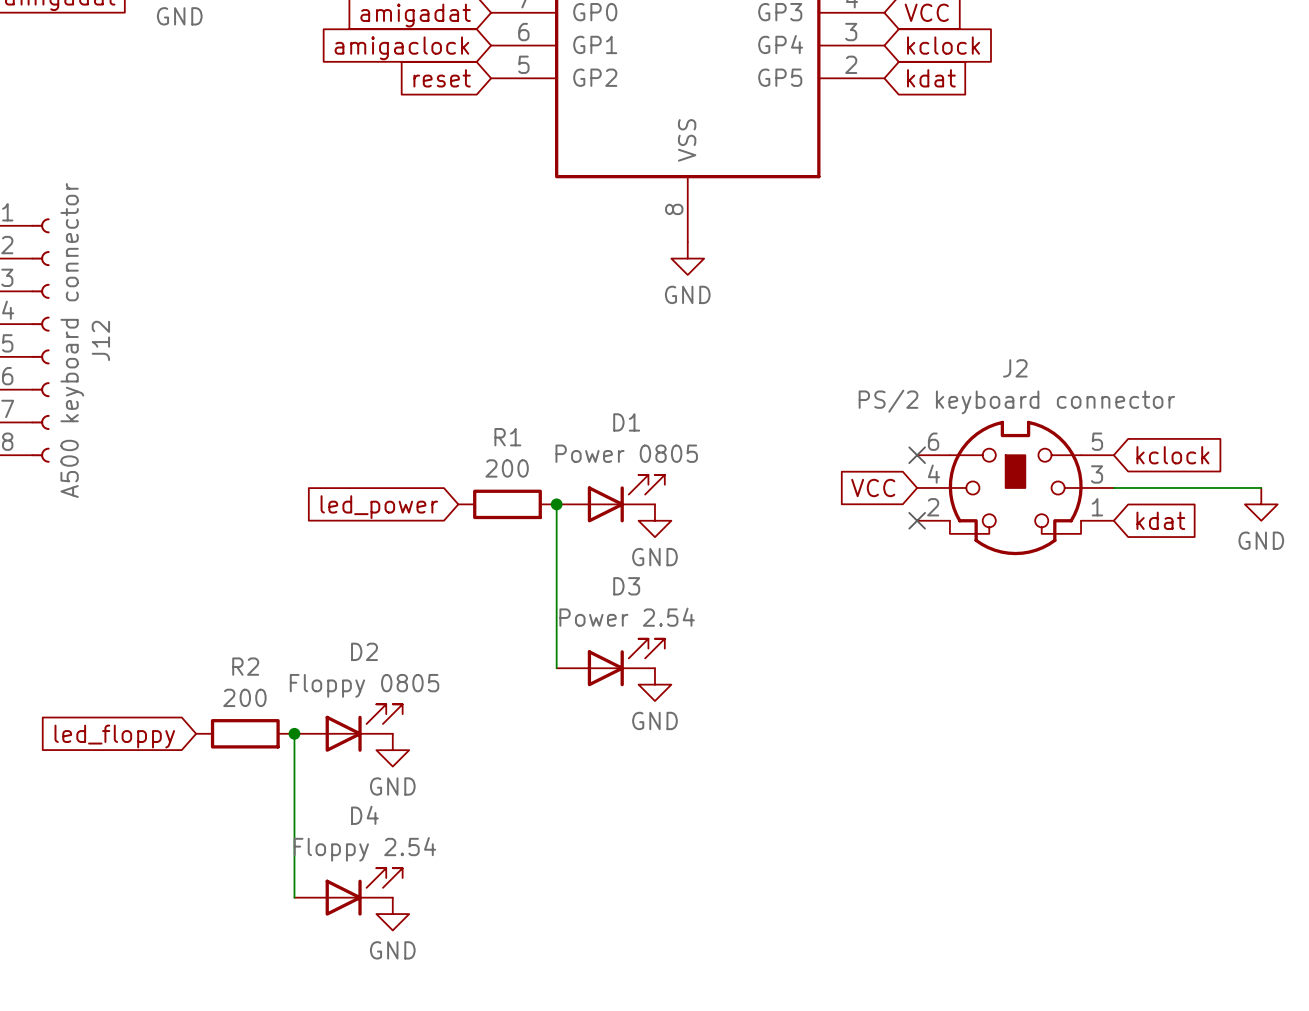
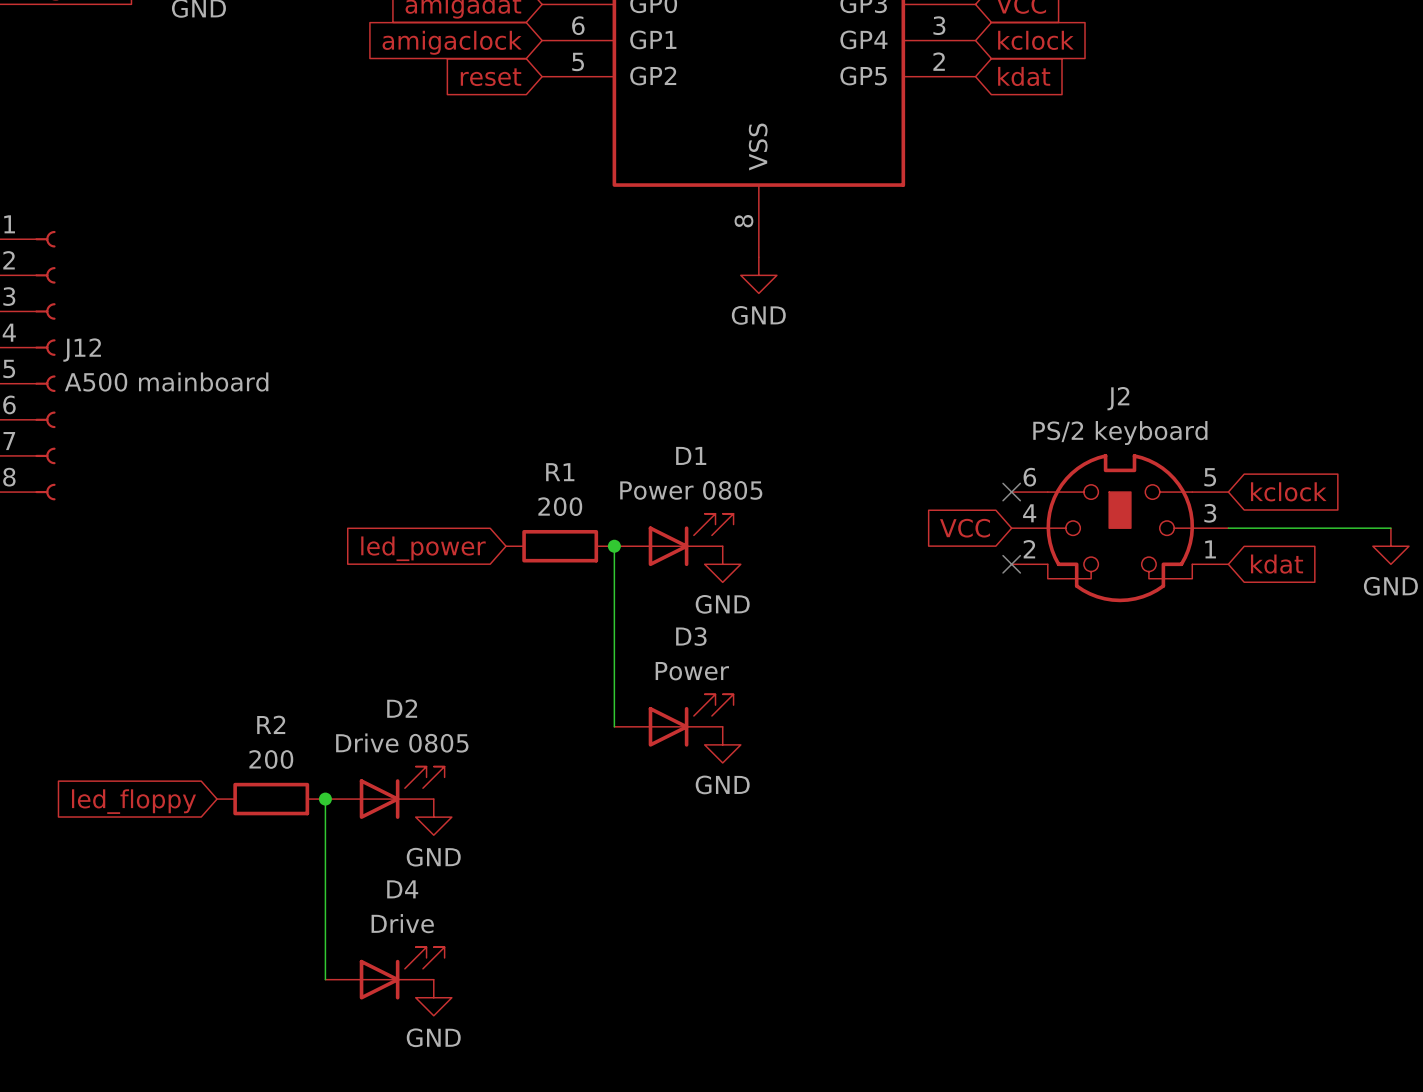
J12 value: A500 keyboard connector (72, 340) -> A500 mainboard (166, 382)
J12 name rotation: 0° (100, 340) -> 90° clockwise (82, 350)
J2 value: PS/2 keyboard connector (1016, 401) -> PS/2 keyboard (1120, 433)
D3 value: Power 2.54 (627, 617) -> Power (692, 671)
D2 value: Floppy 0805 (364, 685) -> Drive 0805 (402, 743)
D4 value: Floppy 2.54 (364, 849) -> Drive (402, 923)

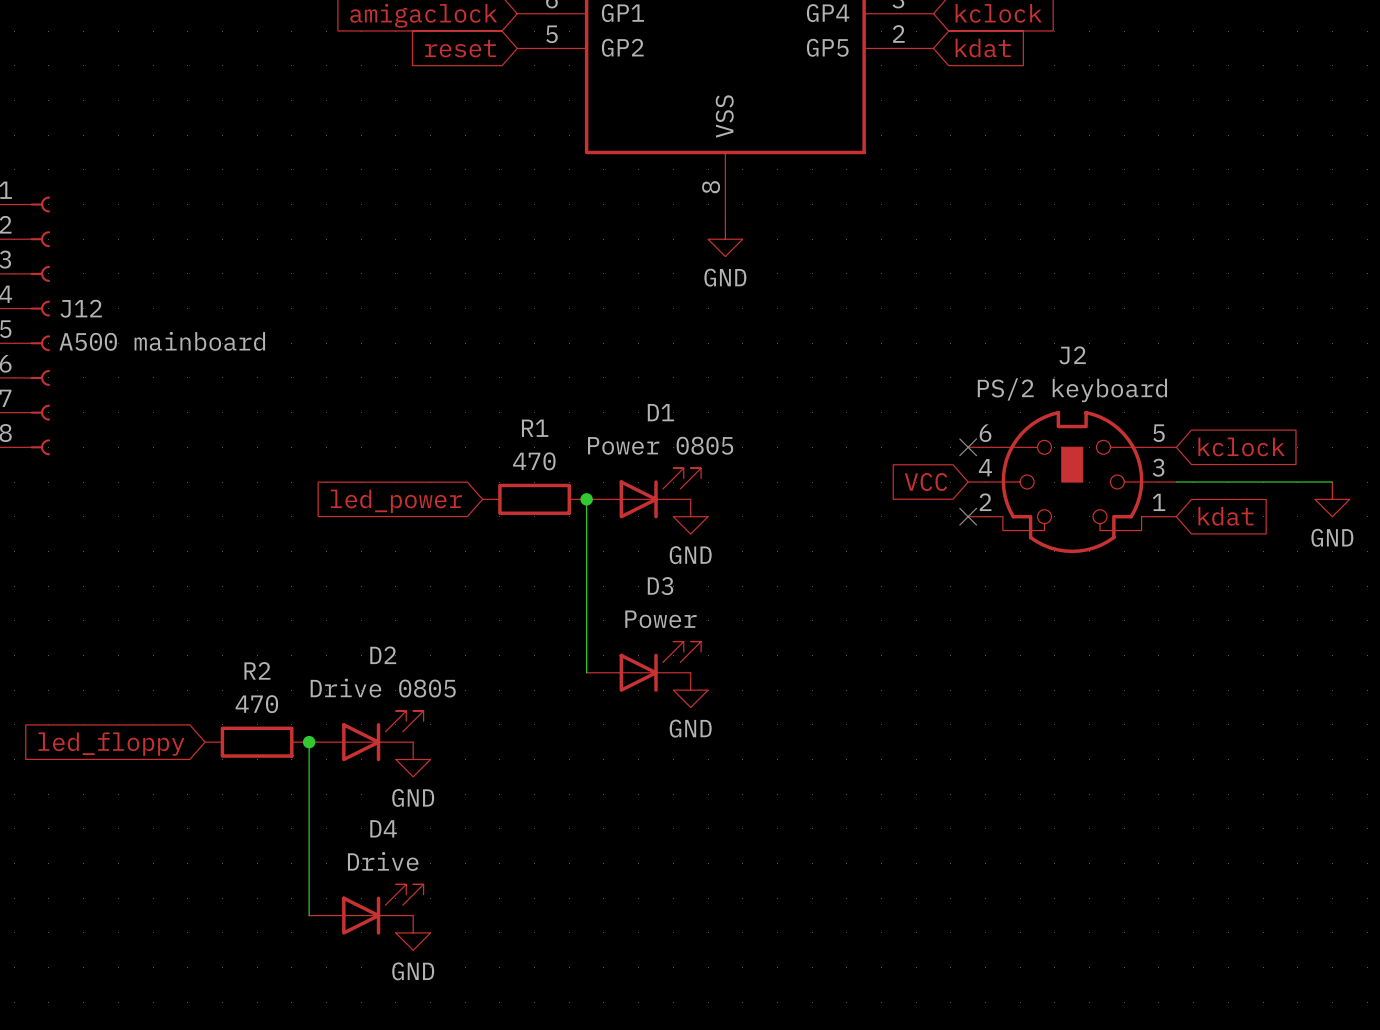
R1 value: 200 (560, 506) -> 470 (534, 461)
R2 value: 200 (271, 759) -> 470 (256, 704)

